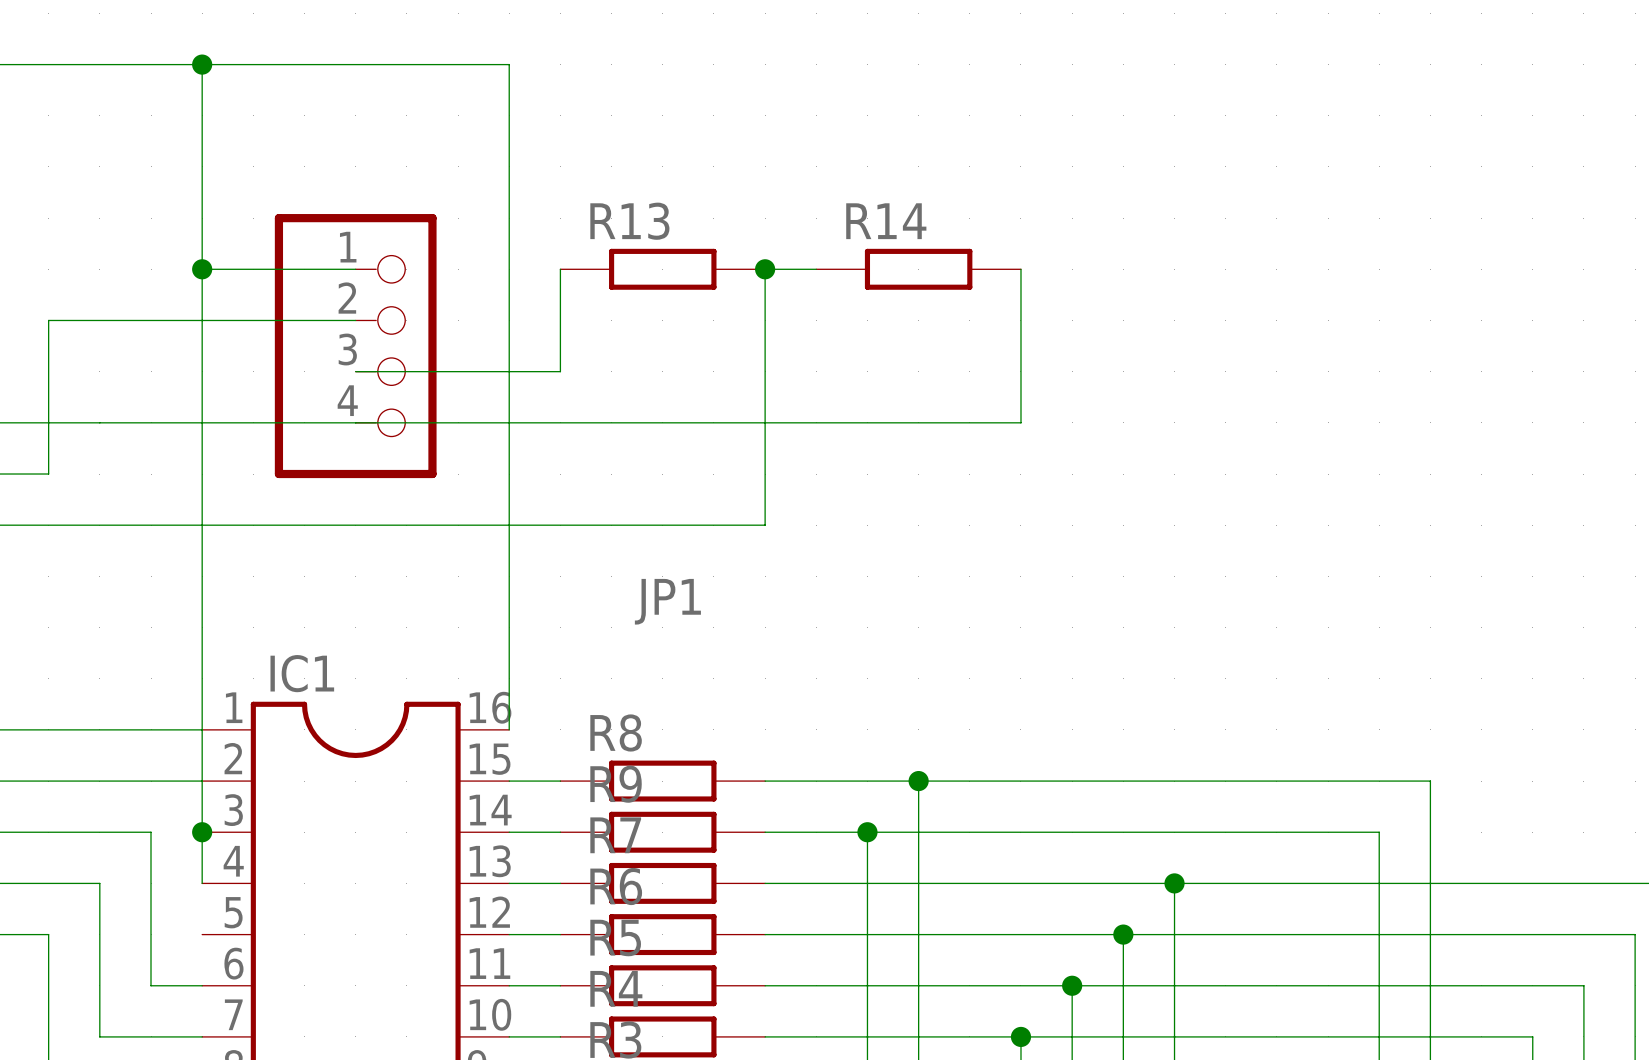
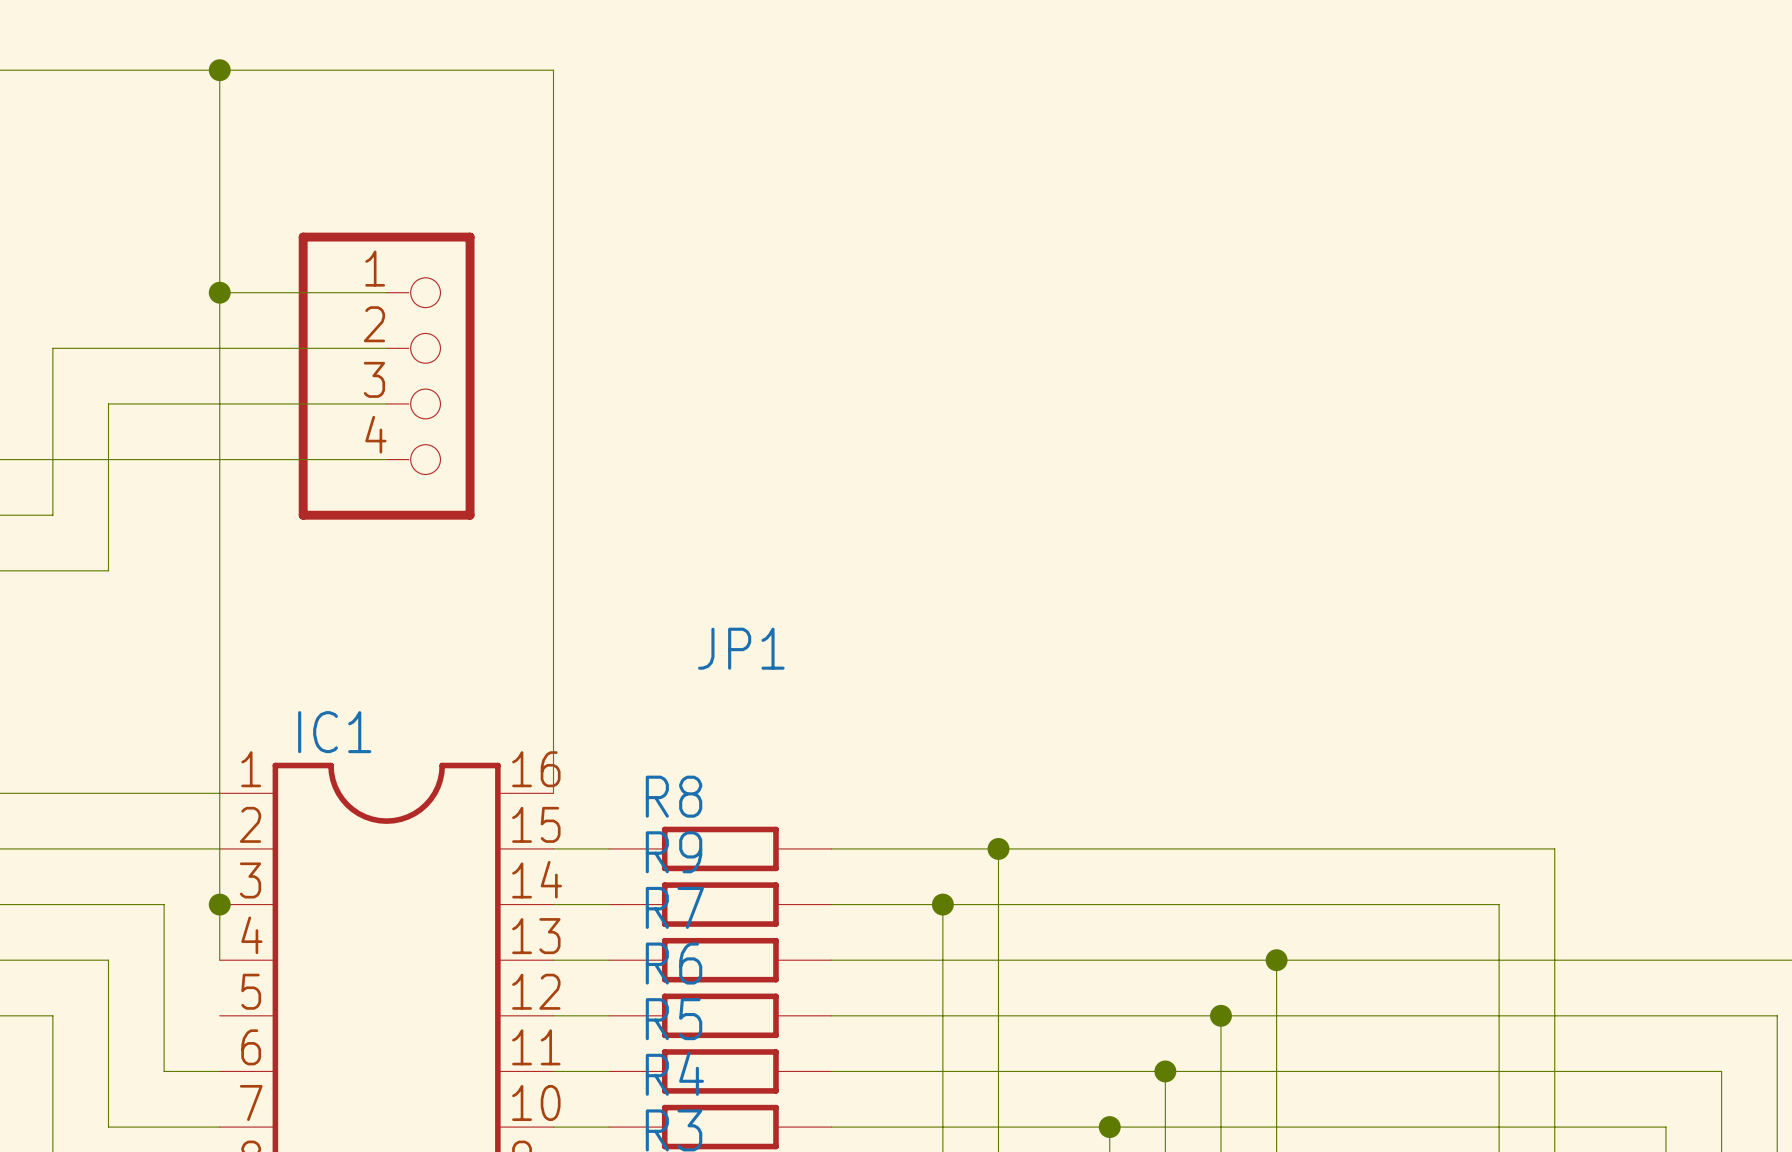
wire: (560, 269) (560, 371) (355, 371) -> none
R13: (662, 269) -> none
junction: (765, 269) -> none
wire: (816, 269) (765, 269) (765, 525) (99, 525) -> (386, 403) (108, 403) (108, 570)
R14: (918, 269) -> none
wire: (1020, 269) (1020, 422) (355, 422) -> none

